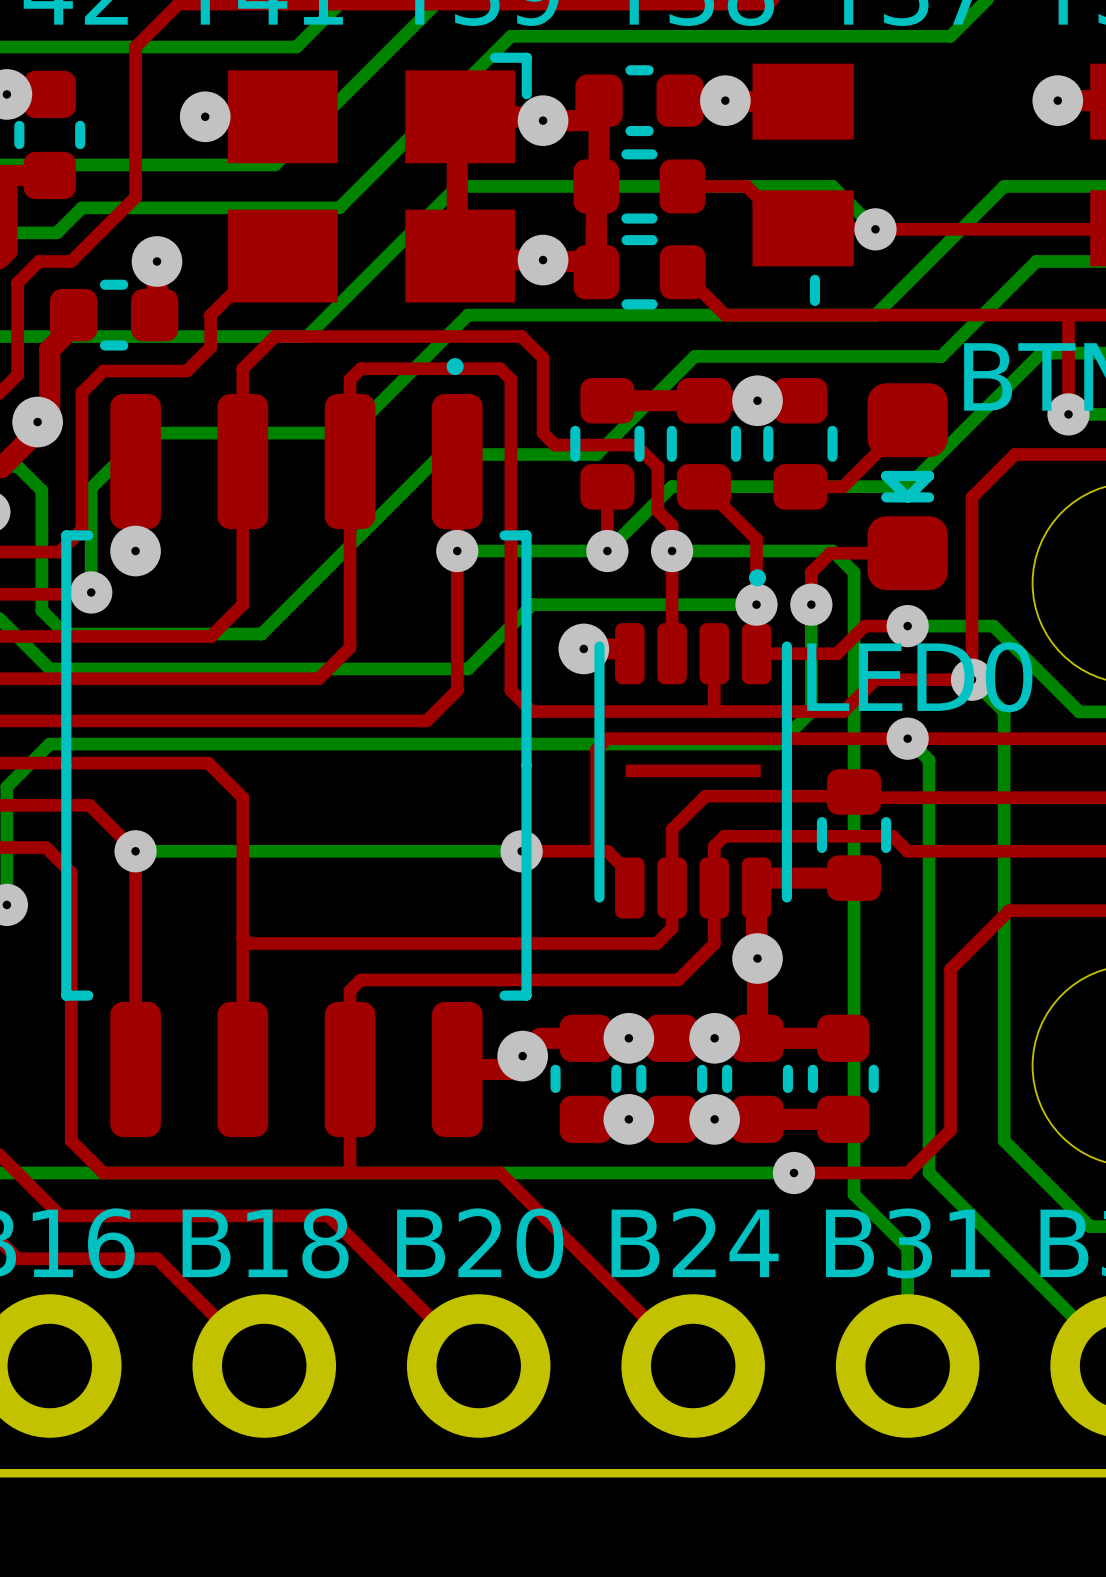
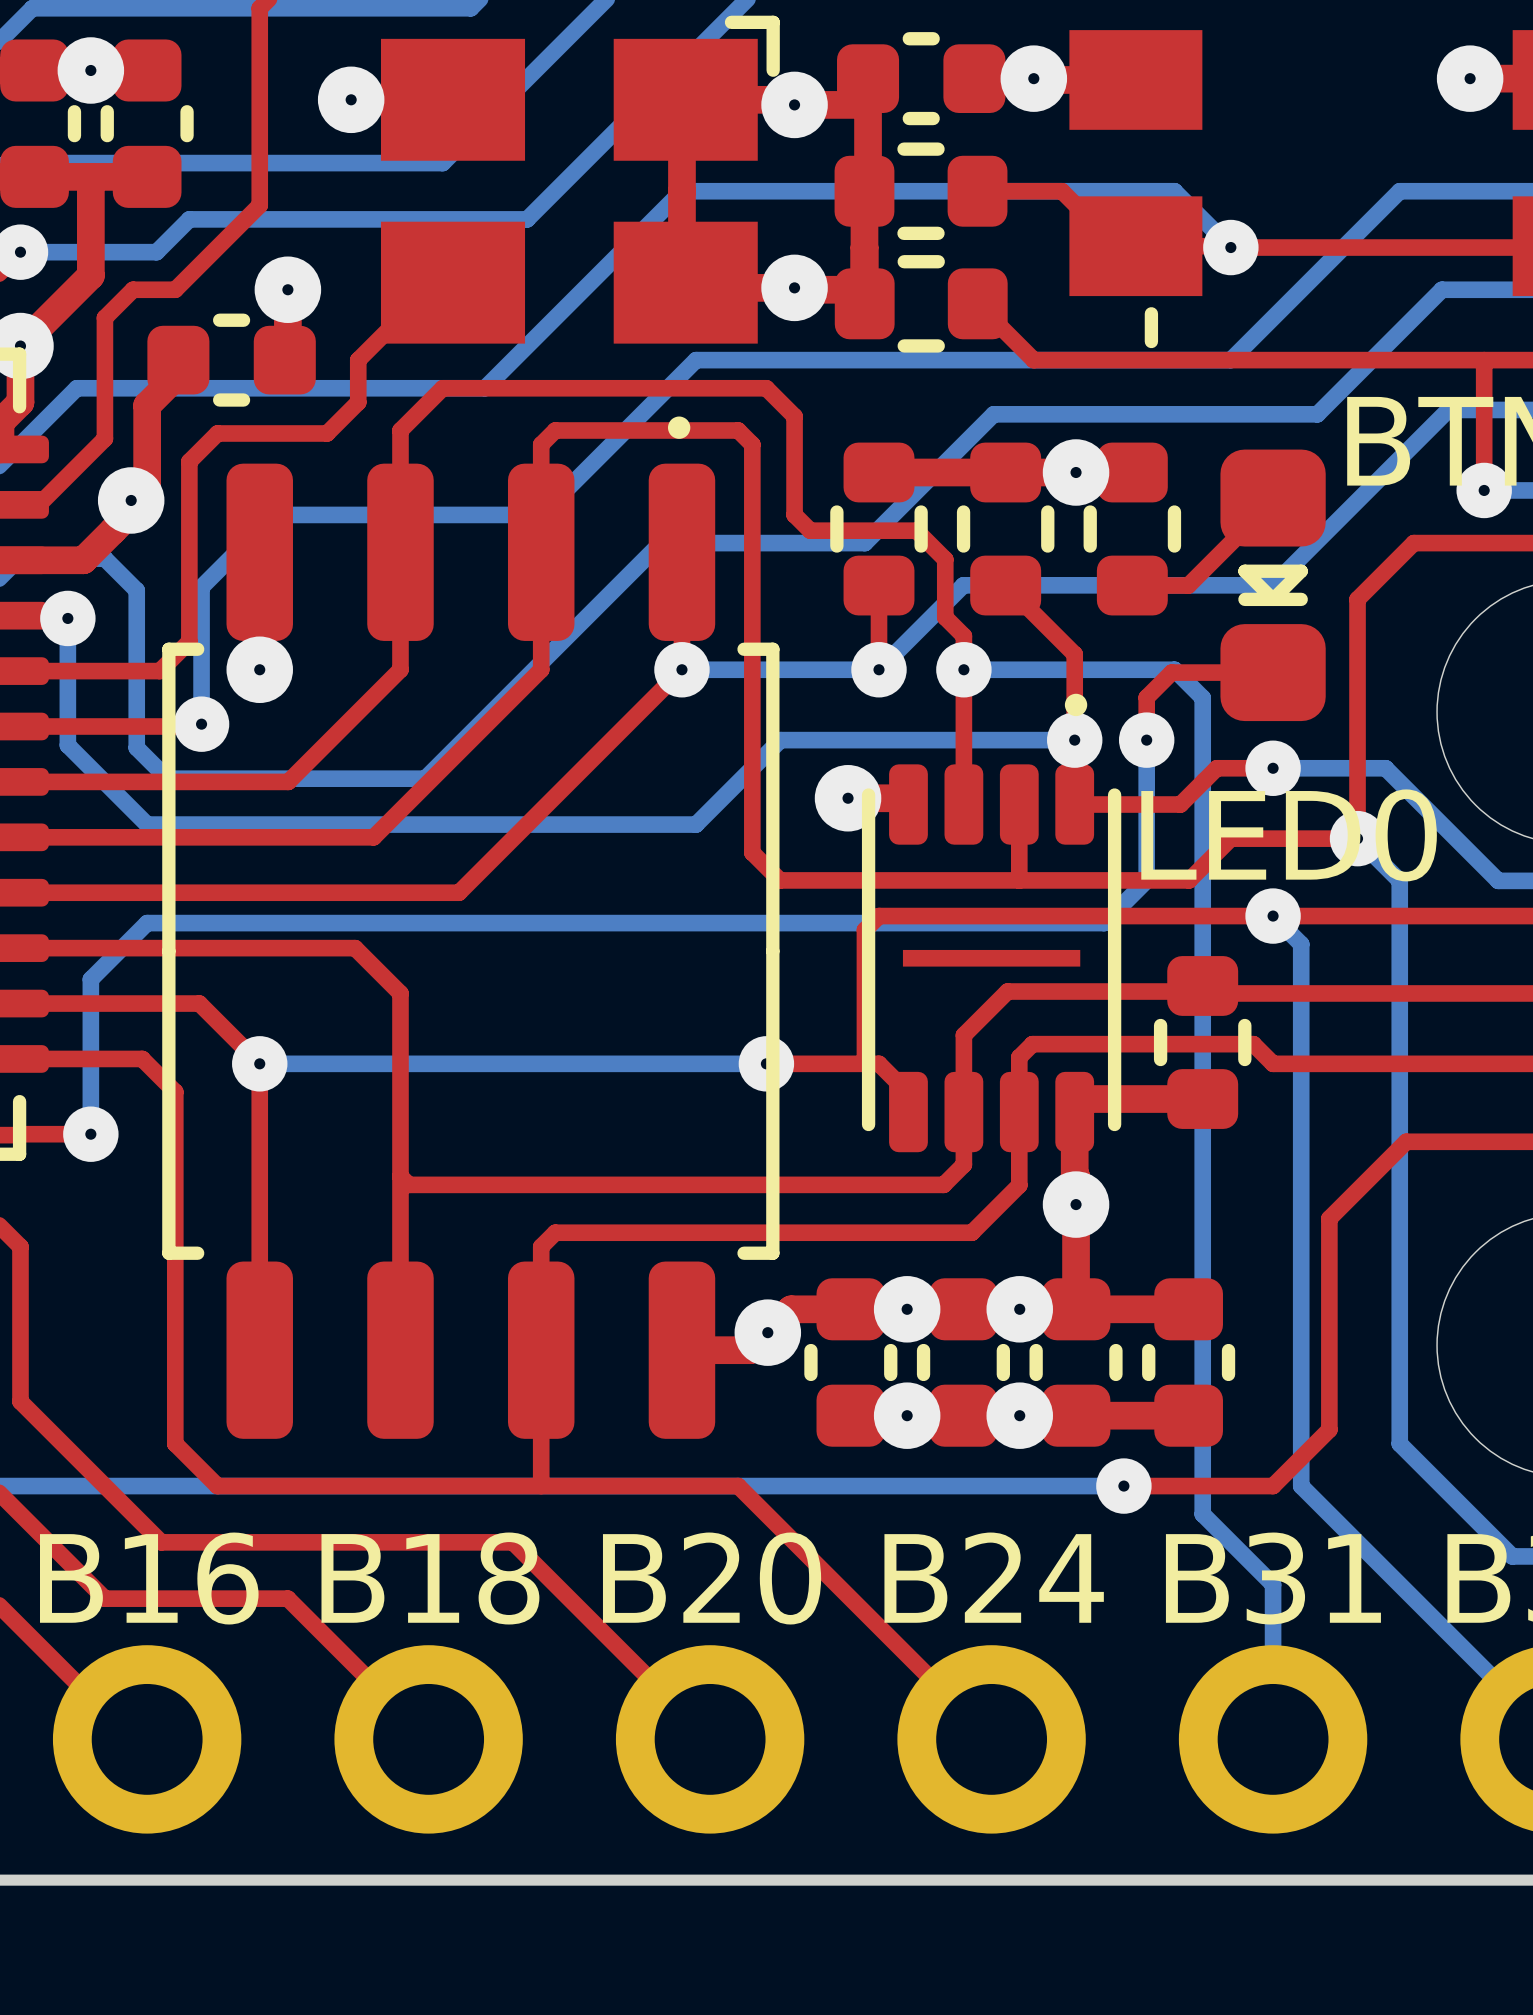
top track: (242, 551) (242, 604) (210, 636) (157, 636) -> (400, 669) (288, 781)
top track: (350, 551) (350, 647) (318, 678) (222, 678) -> (541, 669) (373, 837)
top track: (457, 551) (457, 690) (426, 720) (287, 720) -> (681, 669) (458, 892)

